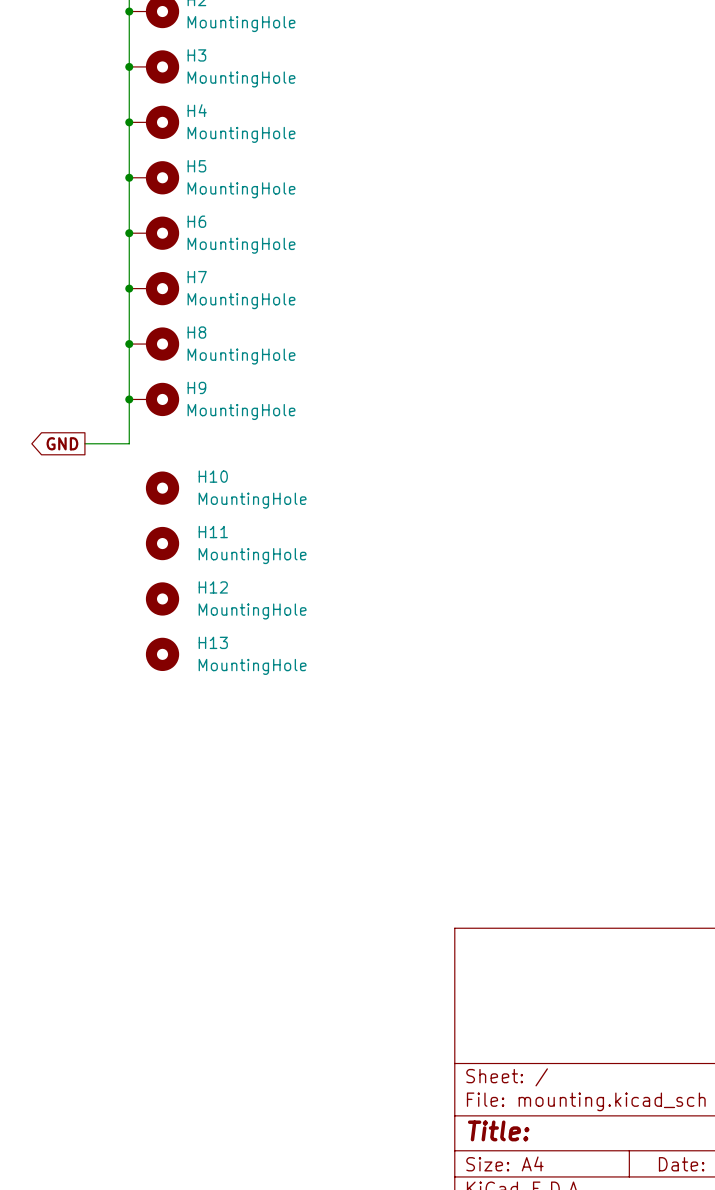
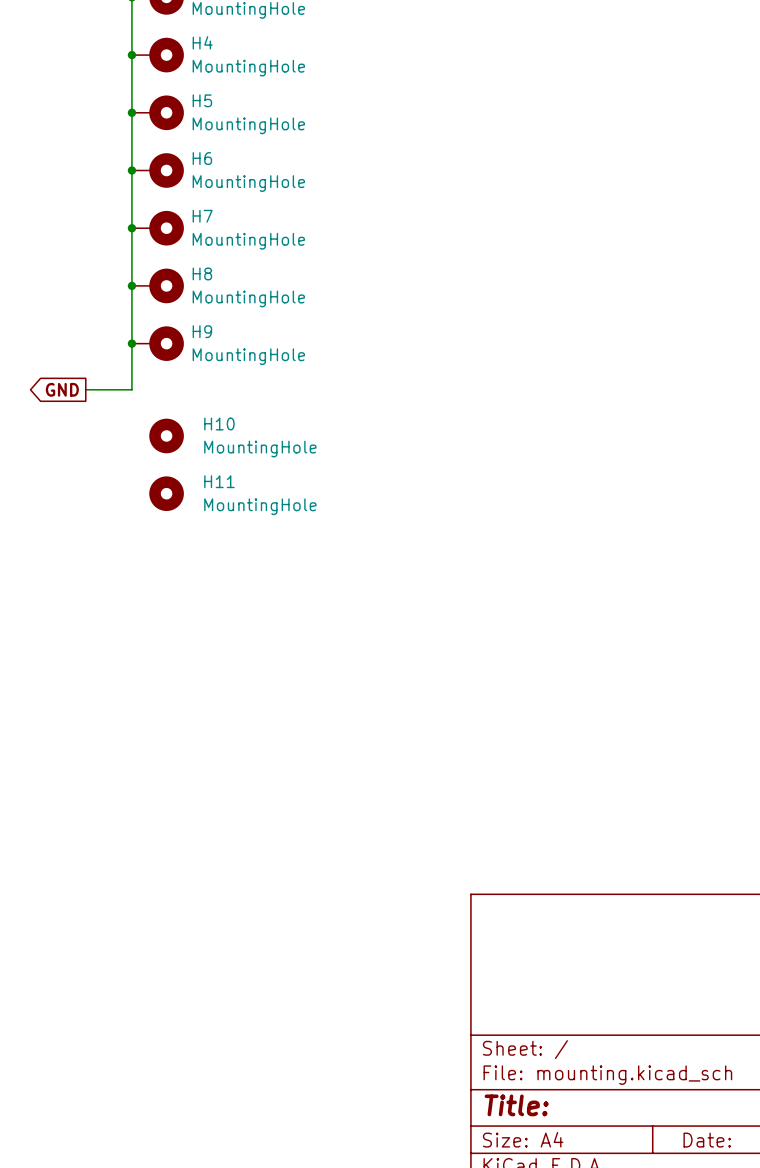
H12: MountingHole (162, 598) -> none
H13: MountingHole (162, 654) -> none

